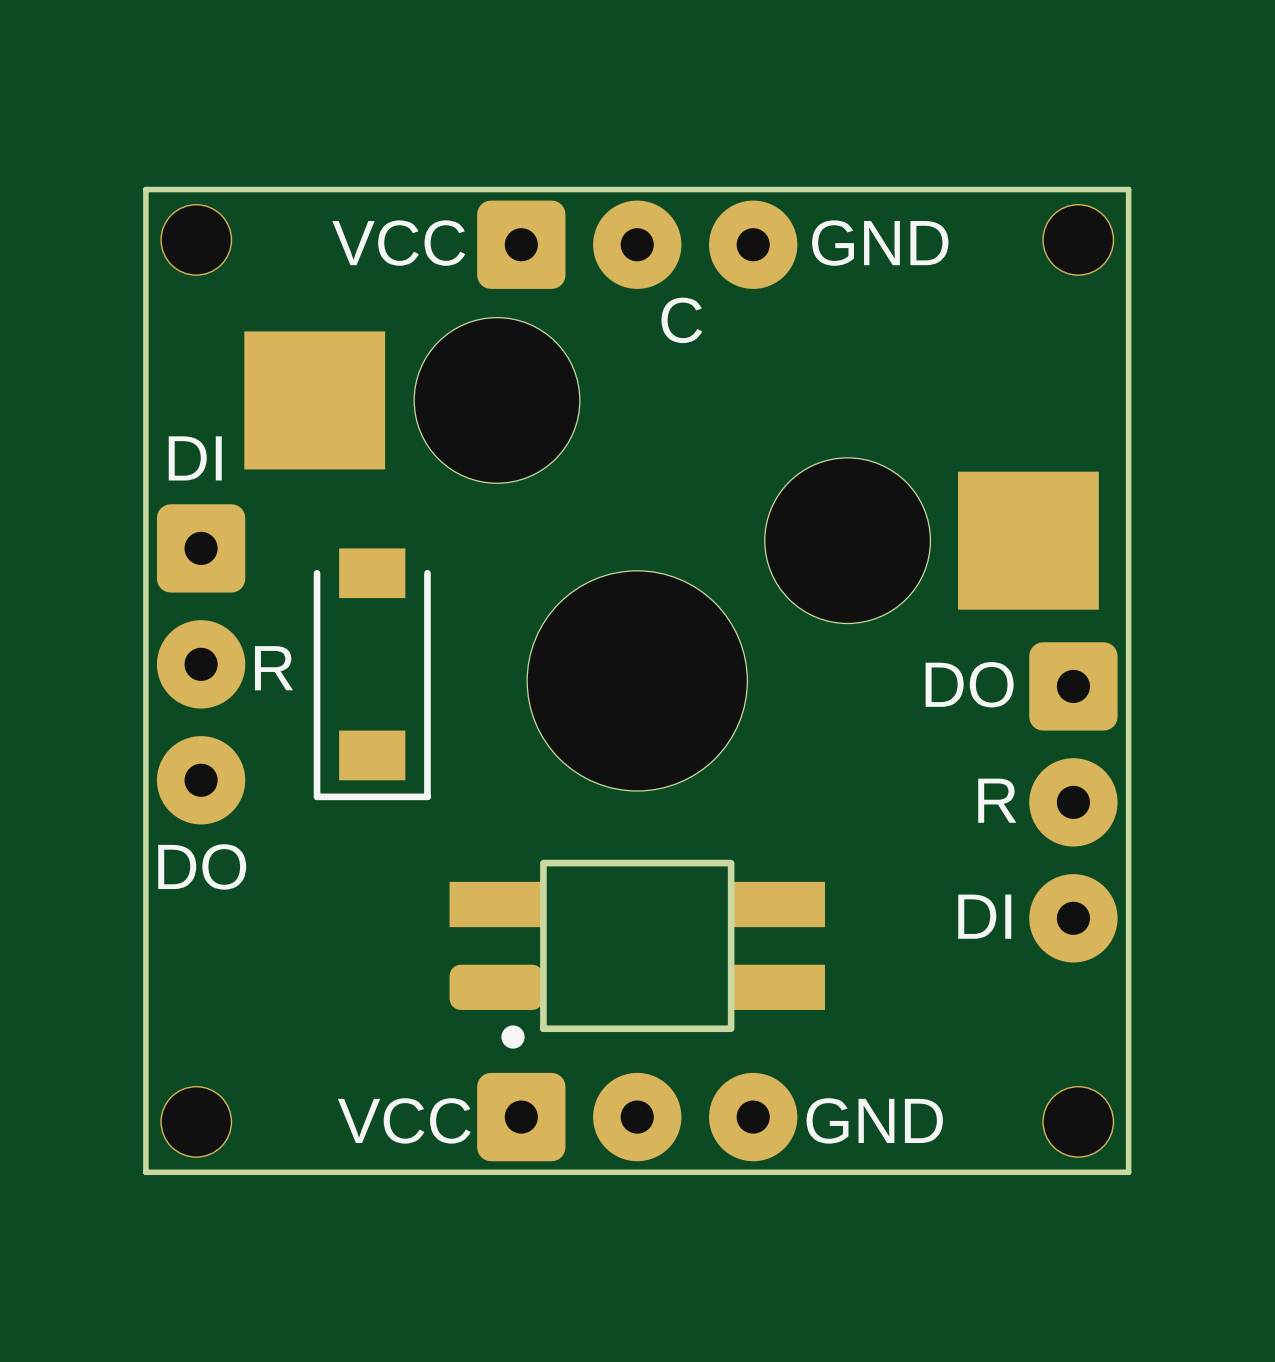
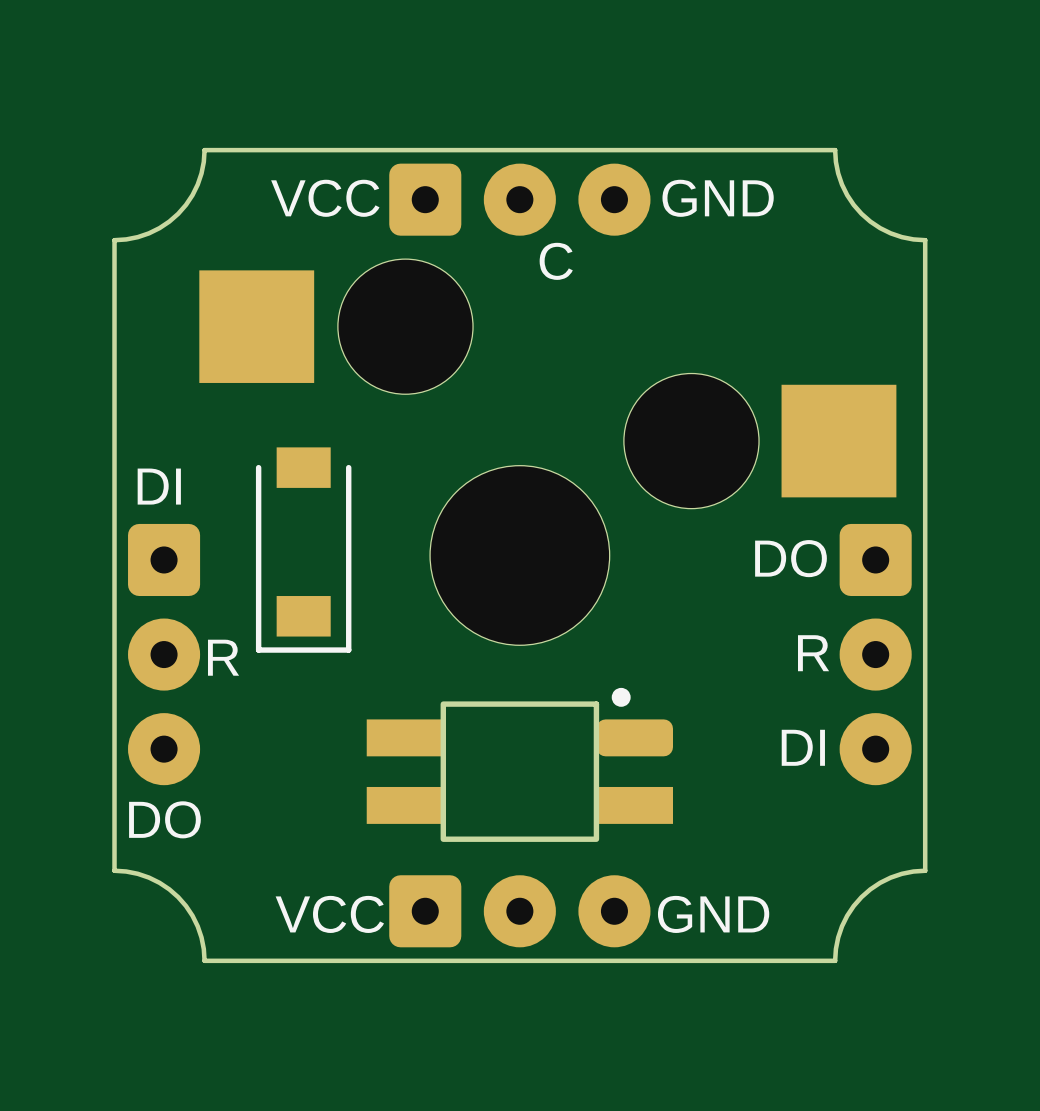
board edge: (145, 189) (1128, 189) (1128, 1172) (145, 1172) (145, 189) -> (204, 150) (201, 173) (197, 184) (192, 195) (178, 213) (159, 228) (148, 233) (137, 237) (114, 240) (114, 870) (137, 873) (148, 877) (159, 882) (178, 897) (192, 915) (197, 926) (201, 937) (204, 960) (835, 960) (838, 937) (841, 926) (847, 915) (861, 897) (880, 882) (890, 877) (901, 873) (925, 870) (925, 240) (901, 237) (890, 233) (880, 228) (861, 213) (847, 195) (841, 184) (838, 173) (835, 150) (204, 150)
part: (196, 239) -> none
part: (1078, 239) -> none
text position: DI (195, 458) -> DI (159, 486)
part position: (201, 664) -> (164, 654)
text position: R (274, 668) -> R (223, 657)
text position: DO (202, 866) -> DO (164, 819)
part rotation: 0° (637, 954) -> 180° (519, 764)
part: (196, 1121) -> none
part: (1078, 1121) -> none

